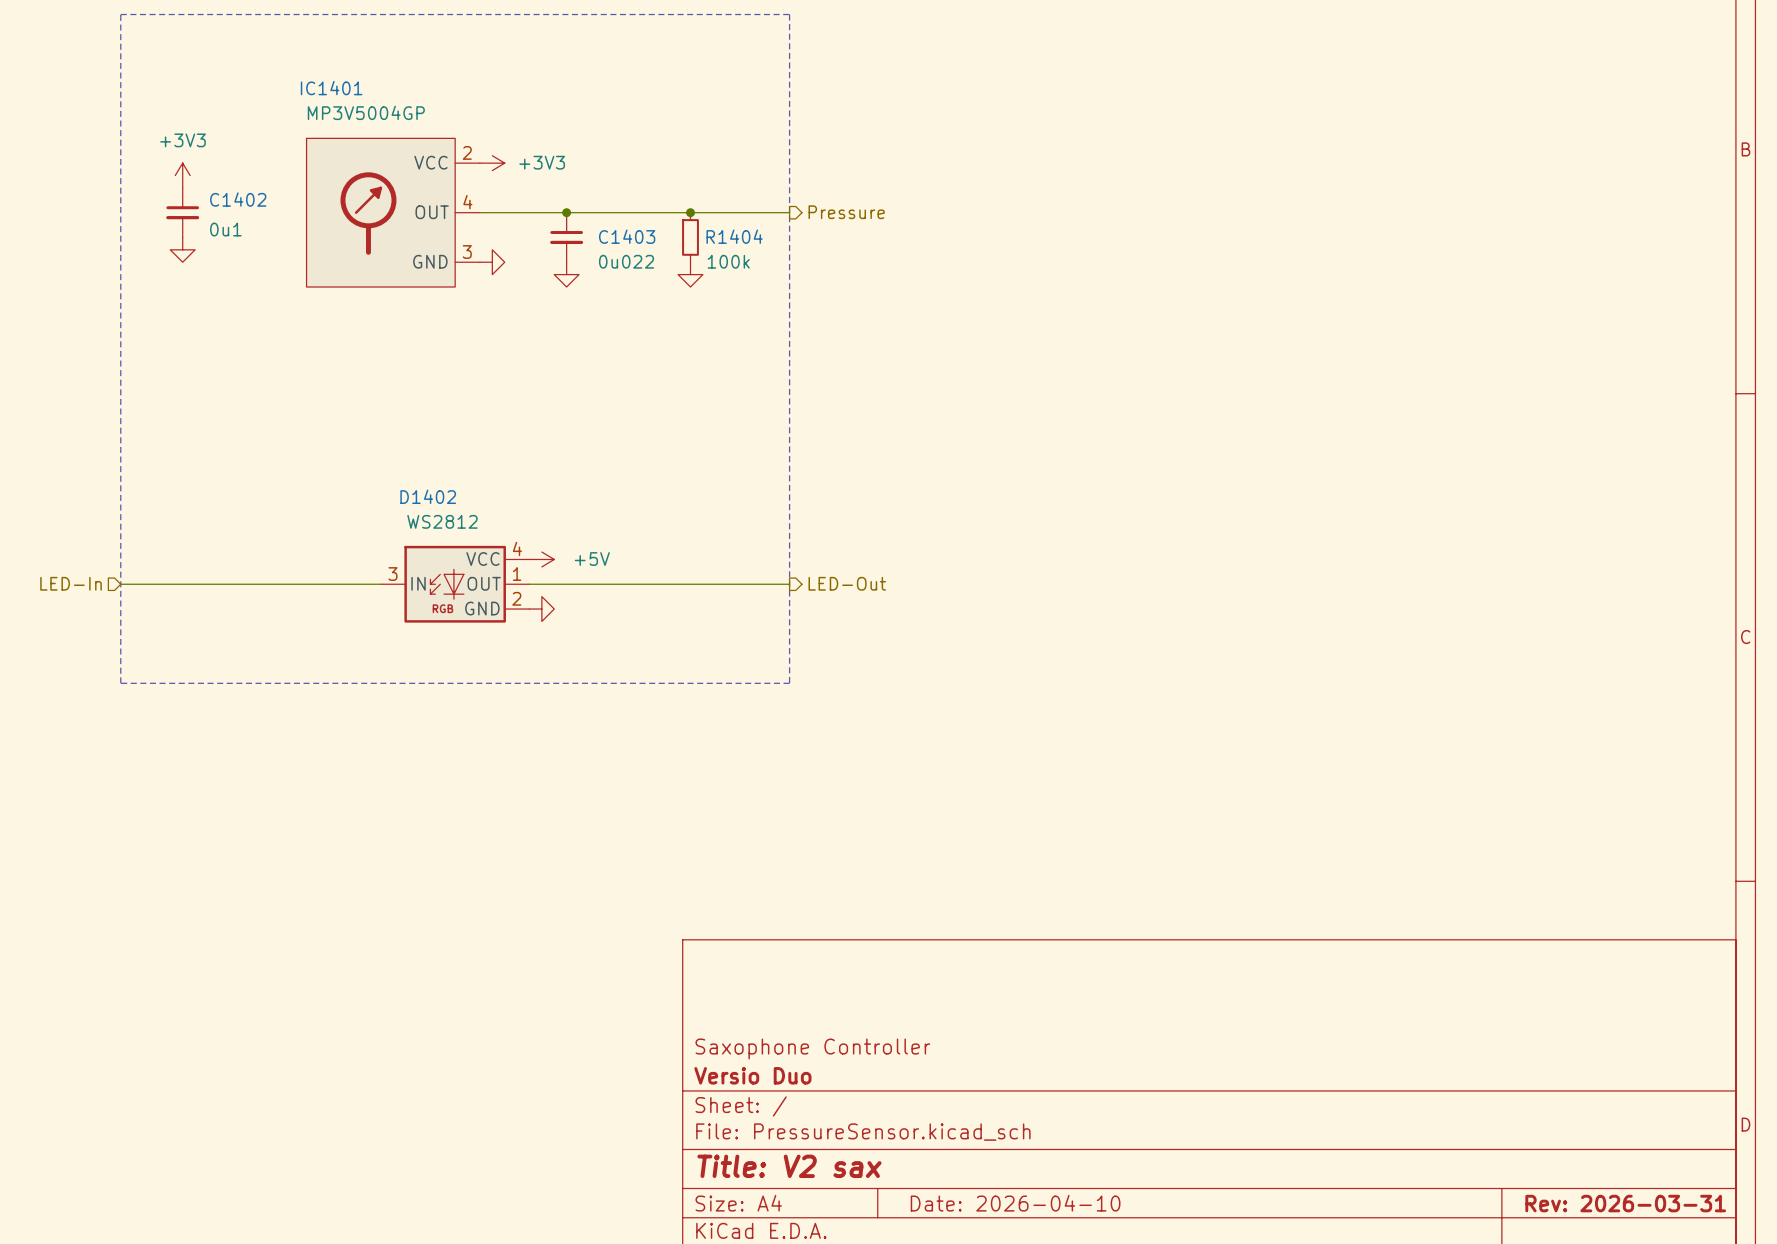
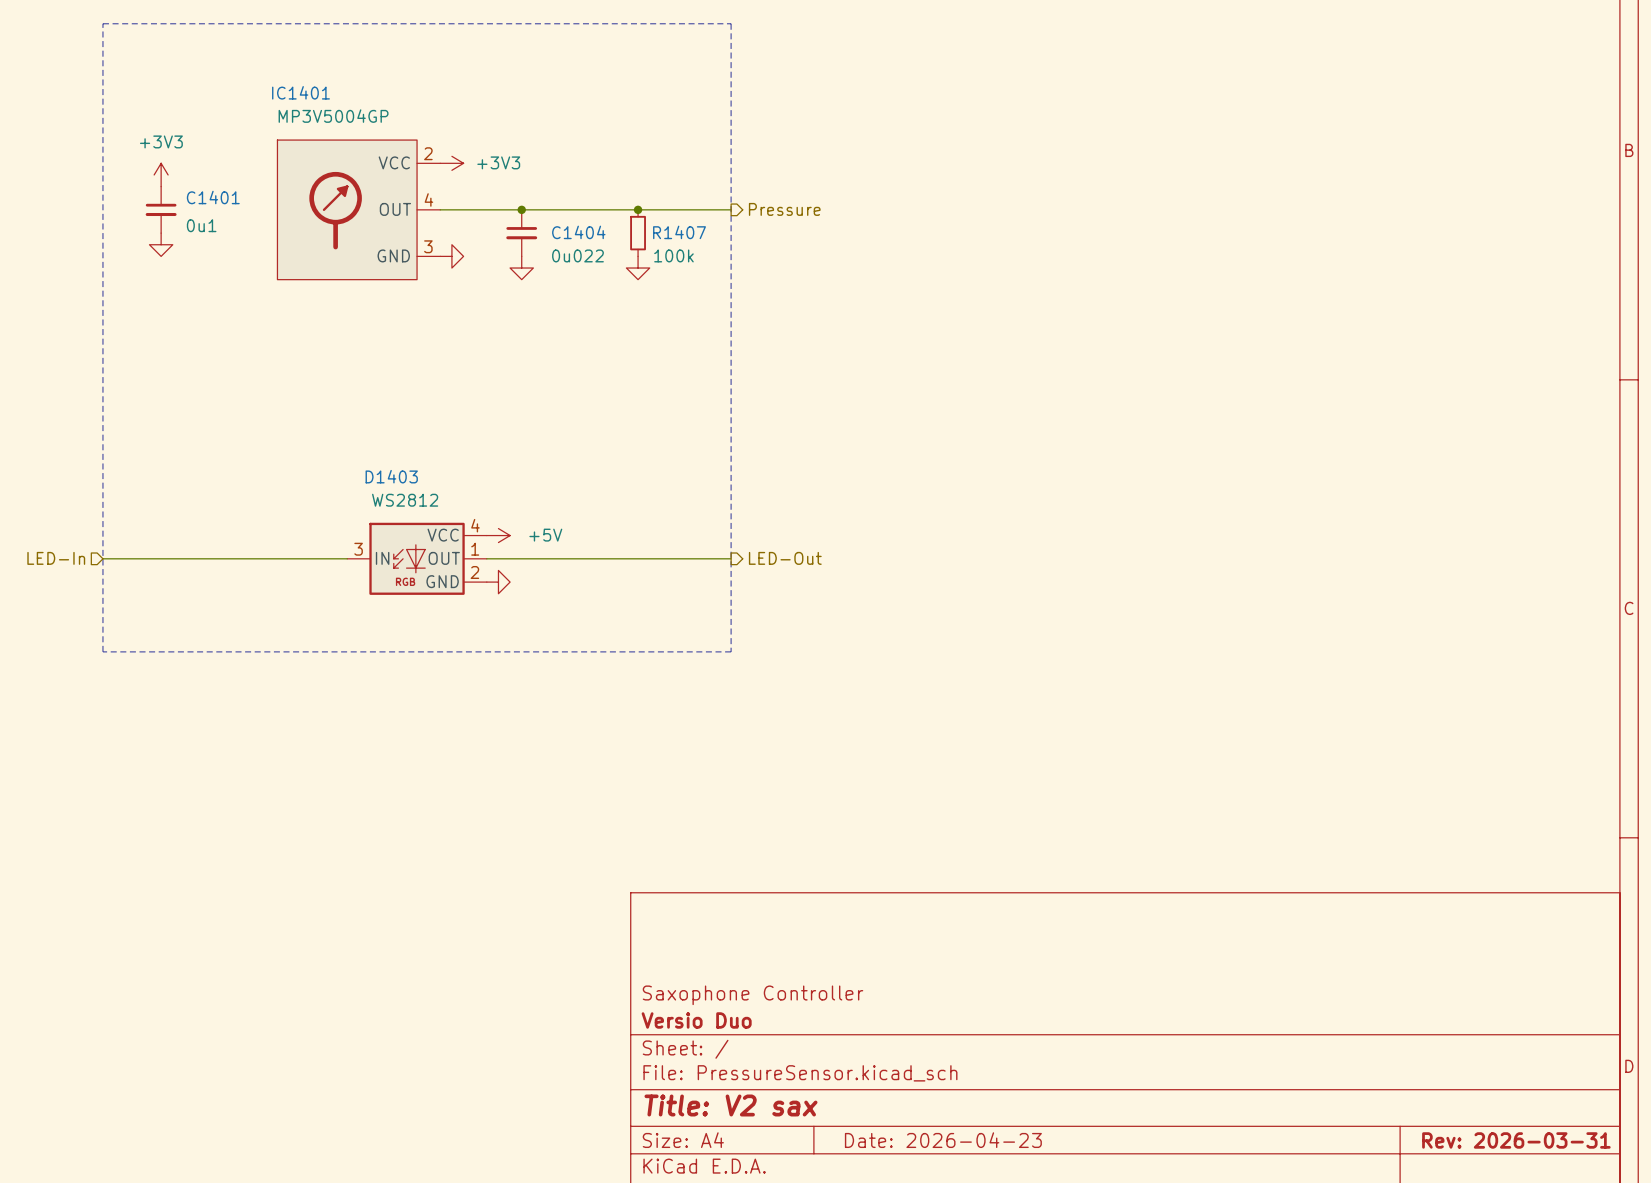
C1402 name: C1402 (238, 199) -> C1401 (213, 197)
C1403 name: C1403 (627, 236) -> C1404 (578, 232)
R1404 name: R1404 (734, 236) -> R1407 (679, 232)
D1402 name: D1402 (428, 496) -> D1403 (391, 476)
title block: Date: 2026-04-10 (1015, 1203) -> Date: 2026-04-23 (943, 1140)

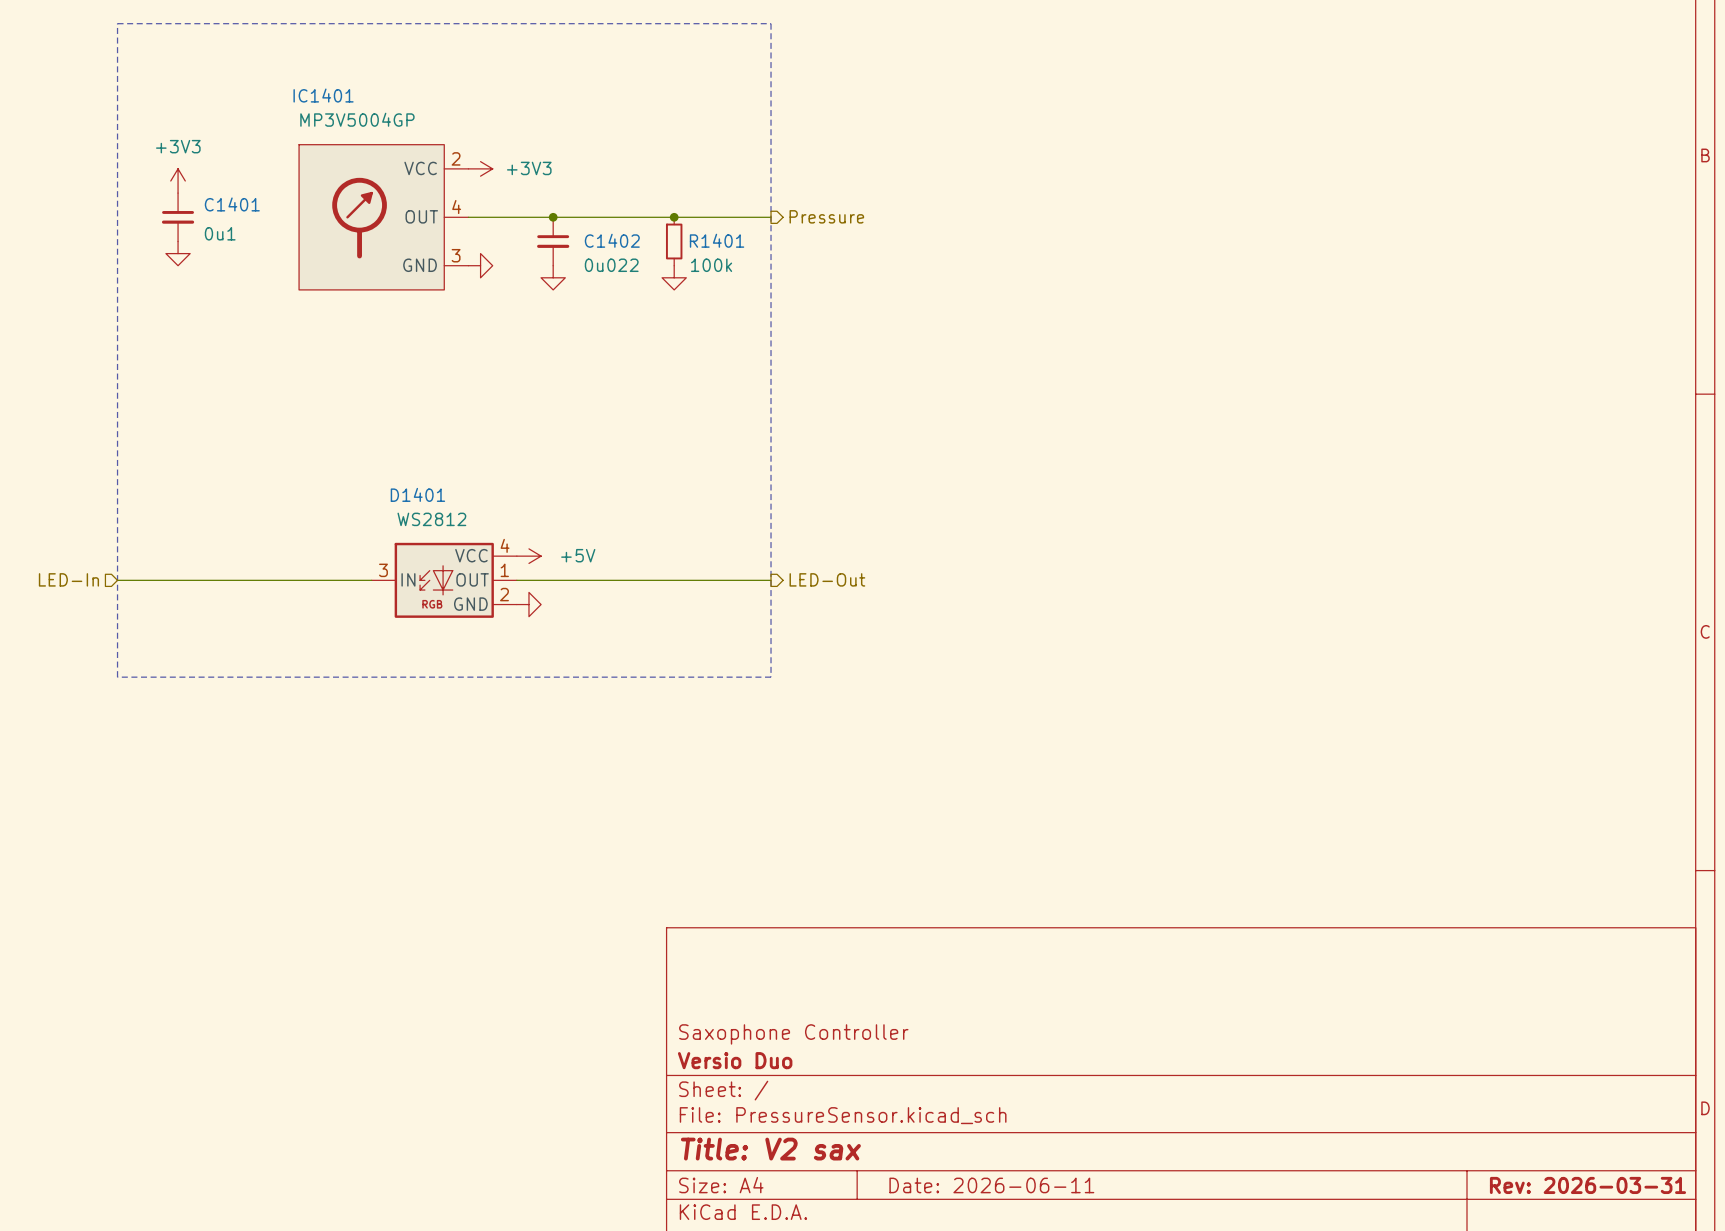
C1404 name: C1404 (578, 232) -> C1402 (612, 240)
R1407 name: R1407 (679, 232) -> R1401 (717, 240)
D1403 name: D1403 (391, 476) -> D1401 (417, 494)
title block: Date: 2026-04-23 (943, 1140) -> Date: 2026-06-11 (991, 1185)

